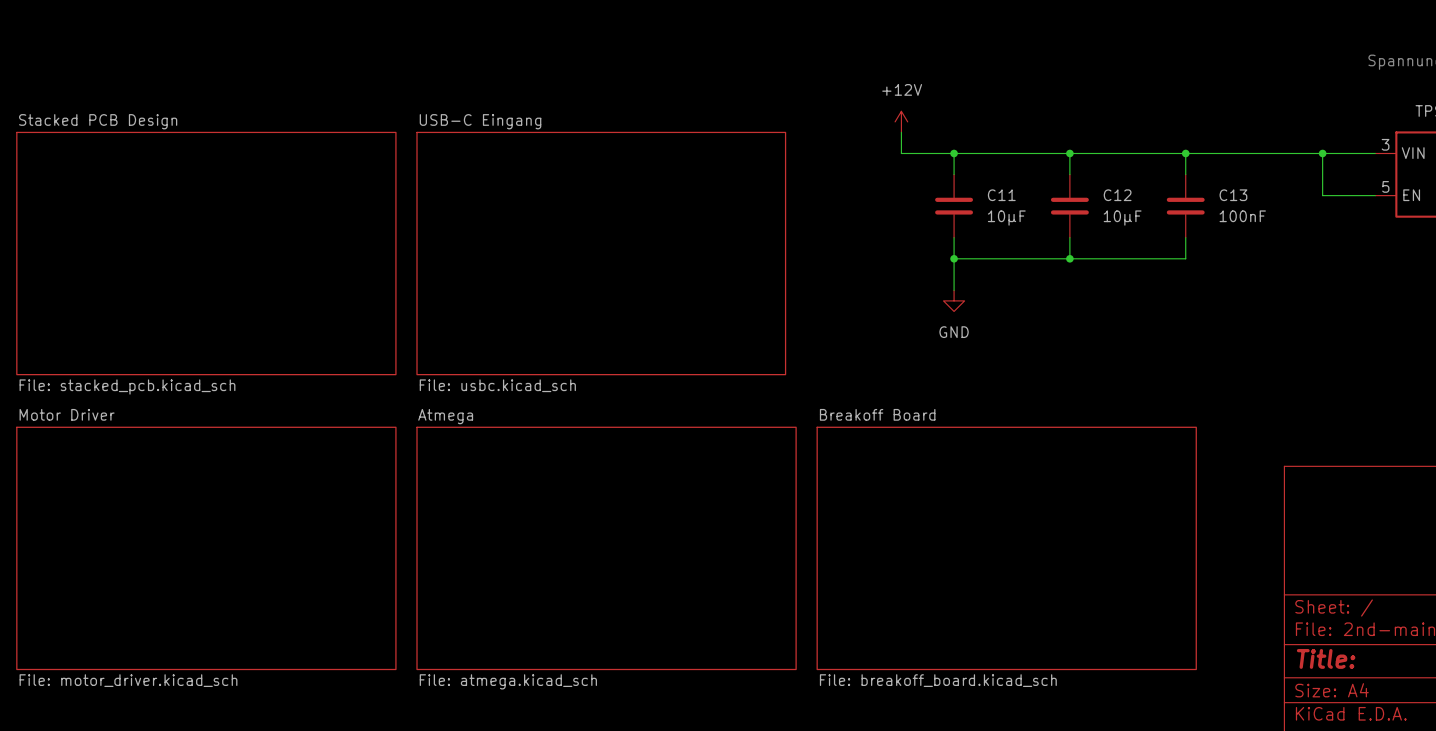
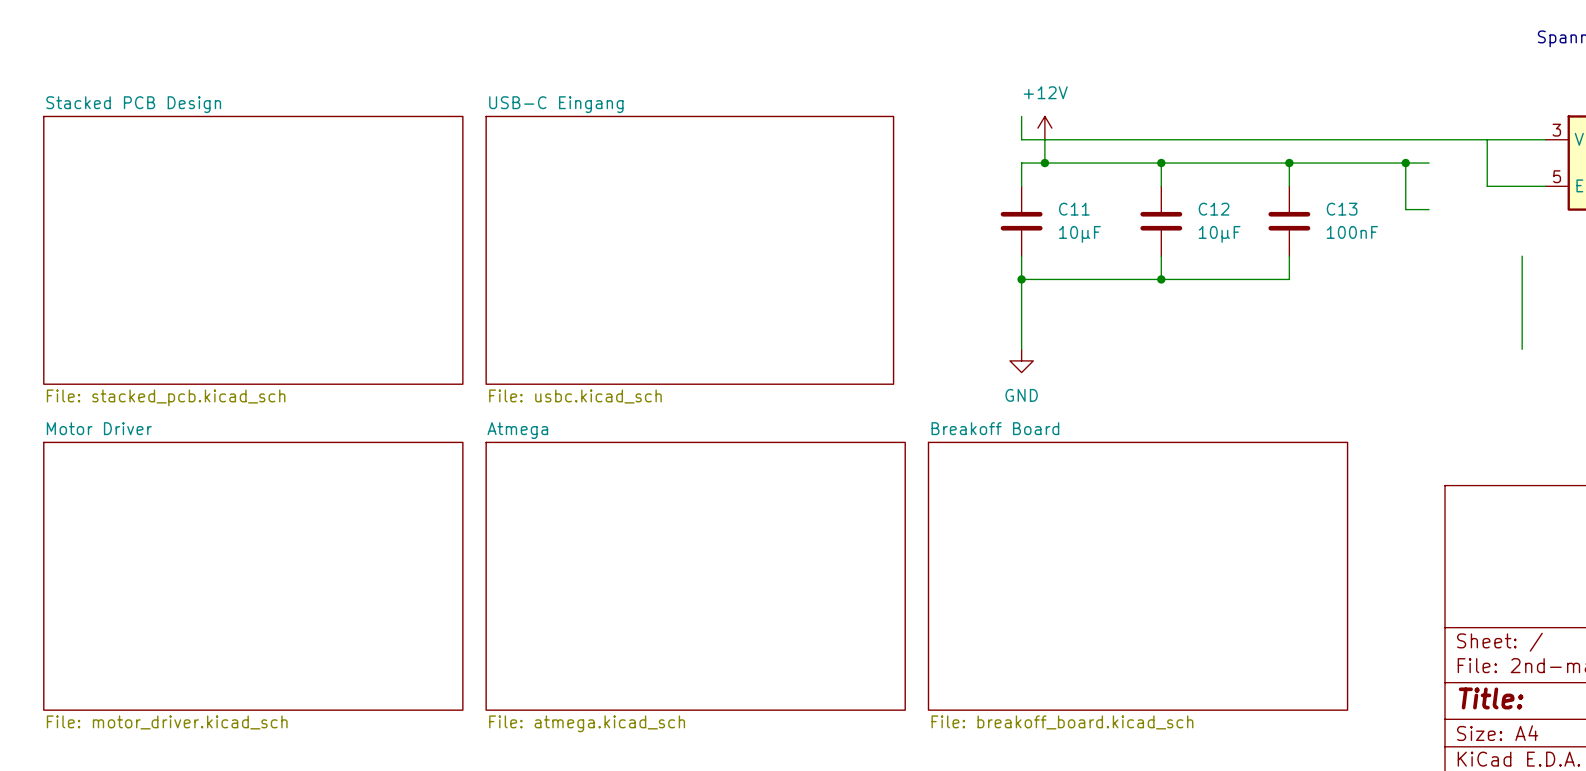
power symbol position: +12V (901, 121) -> +12V (1044, 128)
wire: (954, 153) (954, 174) -> (1044, 139) (1044, 163)
junction position: (954, 153) -> (1044, 163)
wire: (1069, 153) (1069, 174) -> (1161, 163) (1161, 186)
junction: (1069, 153) -> none
wire: (1185, 153) (1185, 174) -> (1289, 163) (1289, 186)
junction: (1185, 153) -> none
junction: (1322, 153) -> none
junction: none -> (1161, 163)
junction: none -> (1289, 163)
wire: none -> (1405, 163) (1405, 209) (1429, 209)
junction: none -> (1405, 163)
wire: none -> (1429, 163) (1021, 163) (1021, 186)
C11 position: (954, 206) -> (1021, 221)
C12 position: (1069, 206) -> (1161, 221)
C13 position: (1185, 206) -> (1289, 221)
wire: (954, 237) (954, 290) -> none
wire: (1069, 237) (1069, 258) -> (1161, 256) (1161, 279)
wire: (1185, 237) (1185, 258) (954, 258) -> none
wire: none -> (1021, 256) (1021, 349)
junction: (954, 258) -> none
junction: (1069, 258) -> none
wire: none -> (1289, 256) (1289, 279) (1021, 279)
wire: none -> (1522, 256) (1522, 349)
junction: none -> (1021, 279)
junction: none -> (1161, 279)
power symbol position: GND (954, 300) -> GND (1021, 360)

